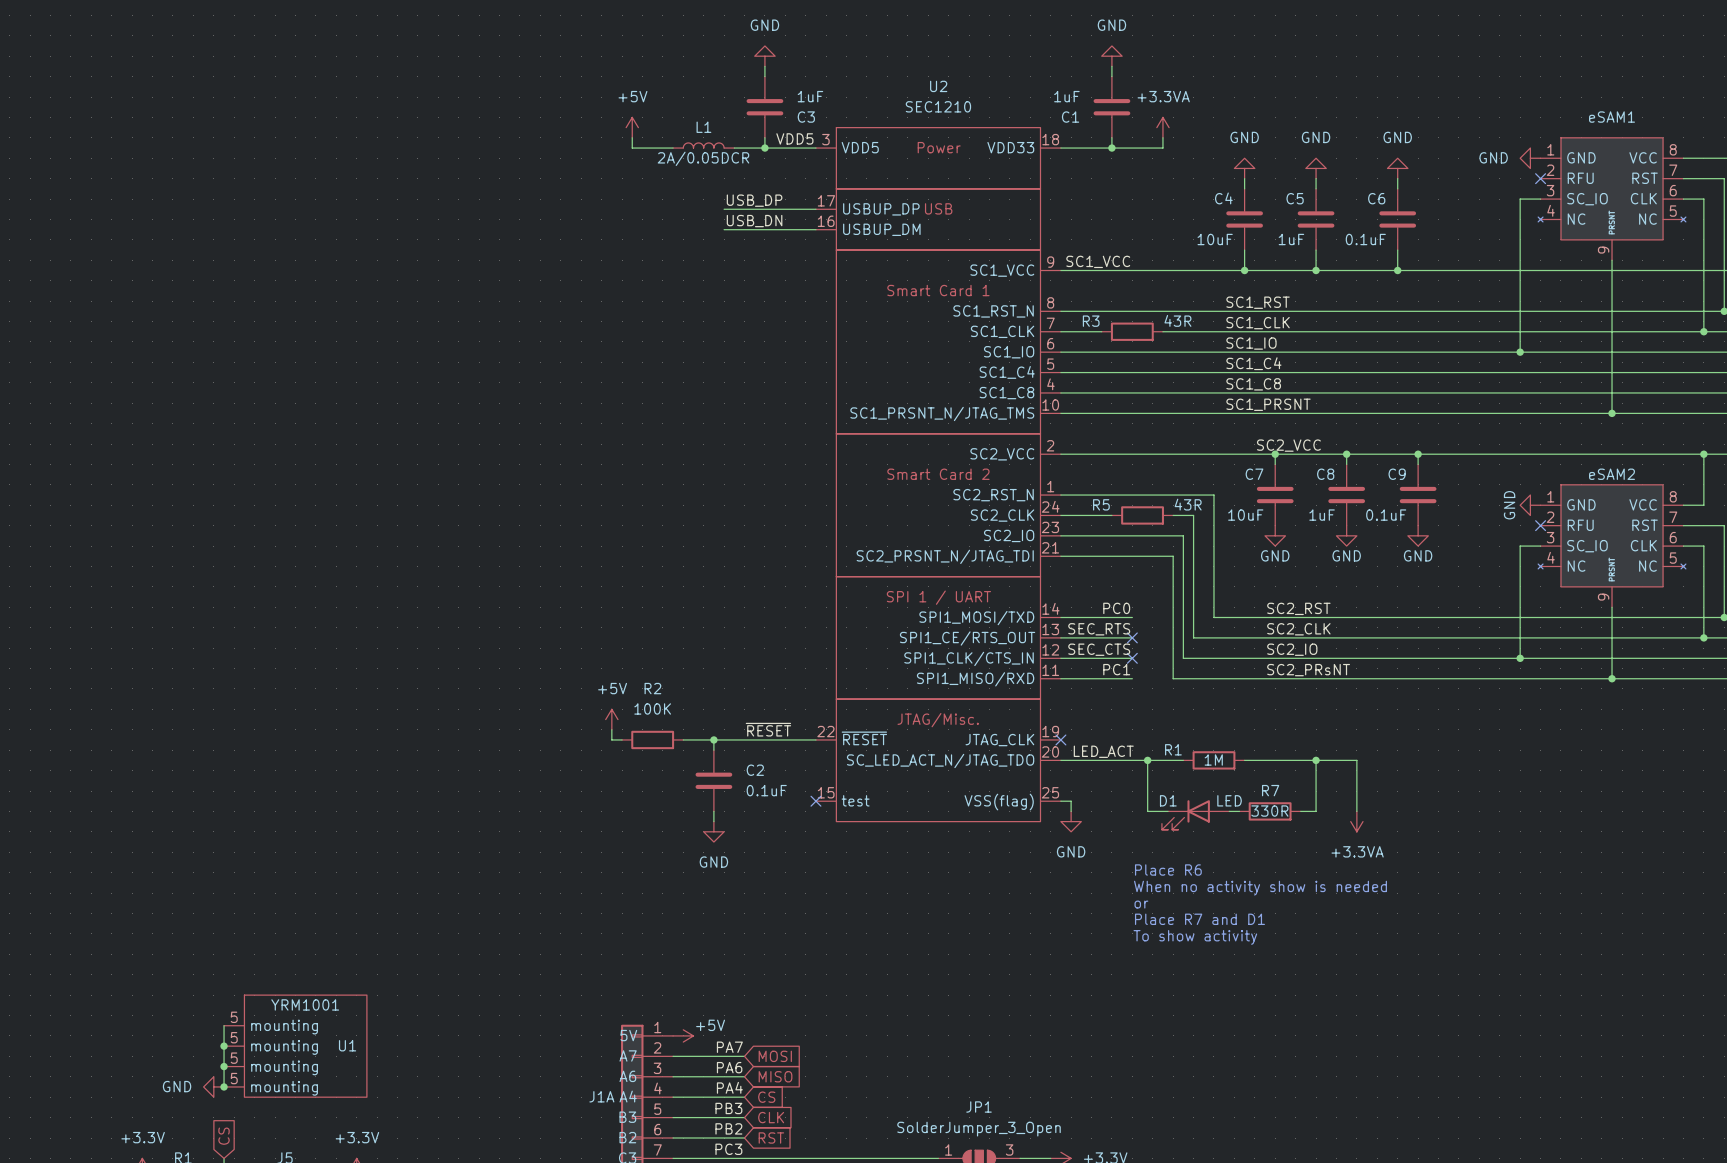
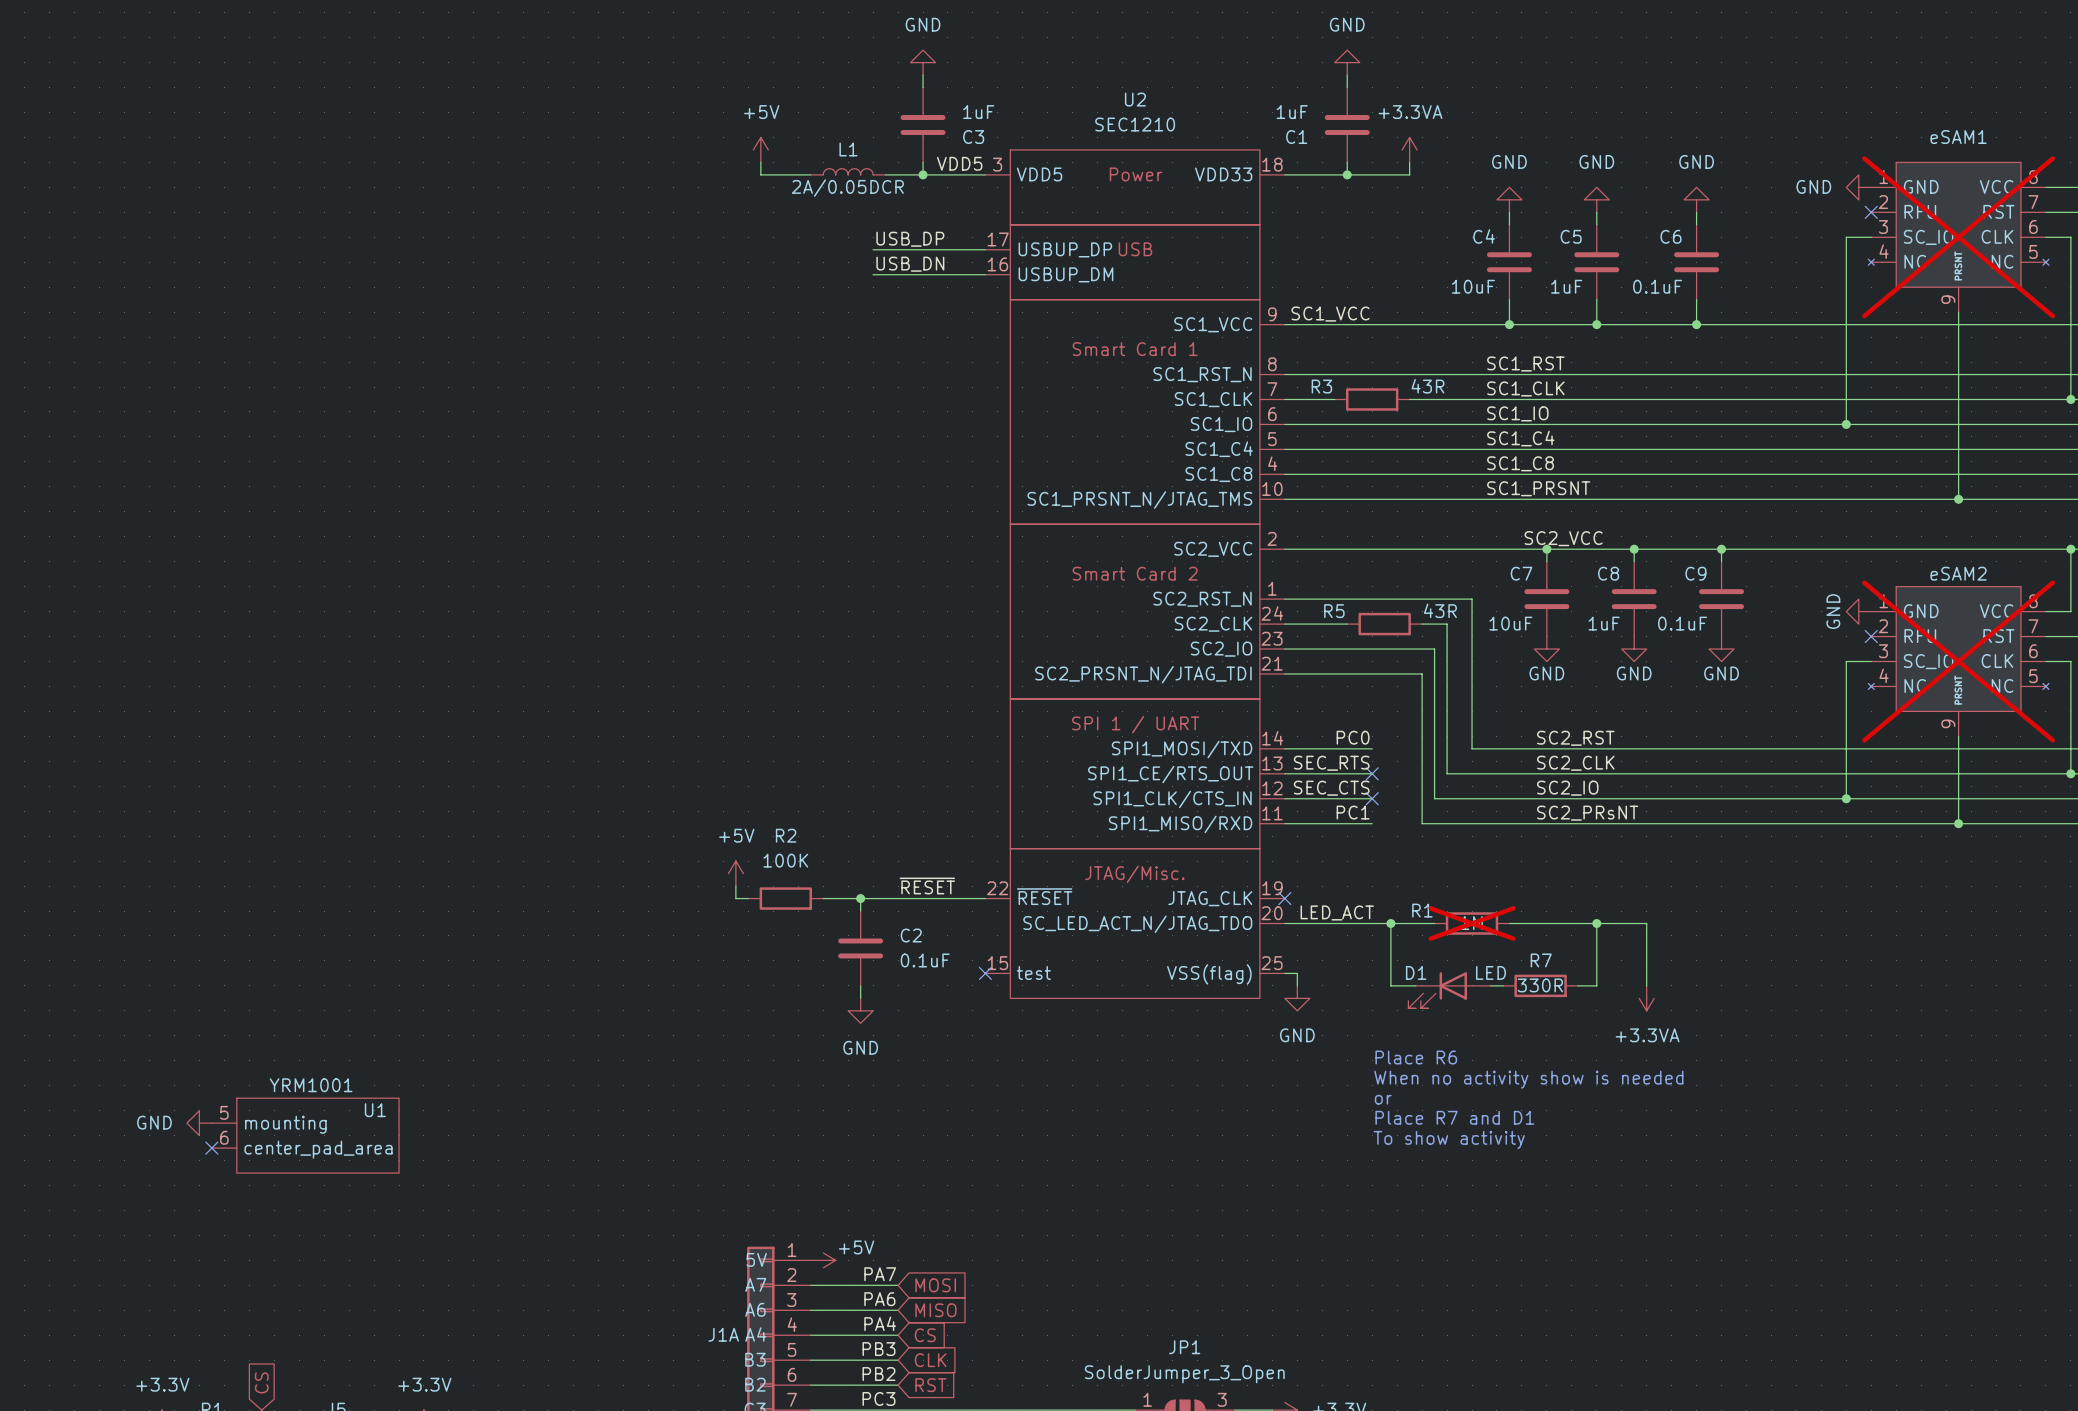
eSAM1 do-not-place cross: none -> (1958, 237)
eSAM2 do-not-place cross: none -> (1958, 661)
R1 do-not-place cross: none -> (1472, 923)
no-connect mark: none -> (211, 1148)
U1 symbol: [224, 995, 367, 1098] -> [211, 1098, 400, 1174]
wire: (224, 1025) (224, 1086) -> none
U1 name position: U1 (347, 1045) -> U1 (375, 1110)
junction: (224, 1046) -> none
junction: (224, 1066) -> none
power symbol position: GND (213, 1086) -> GND (199, 1123)
junction: (224, 1086) -> none

